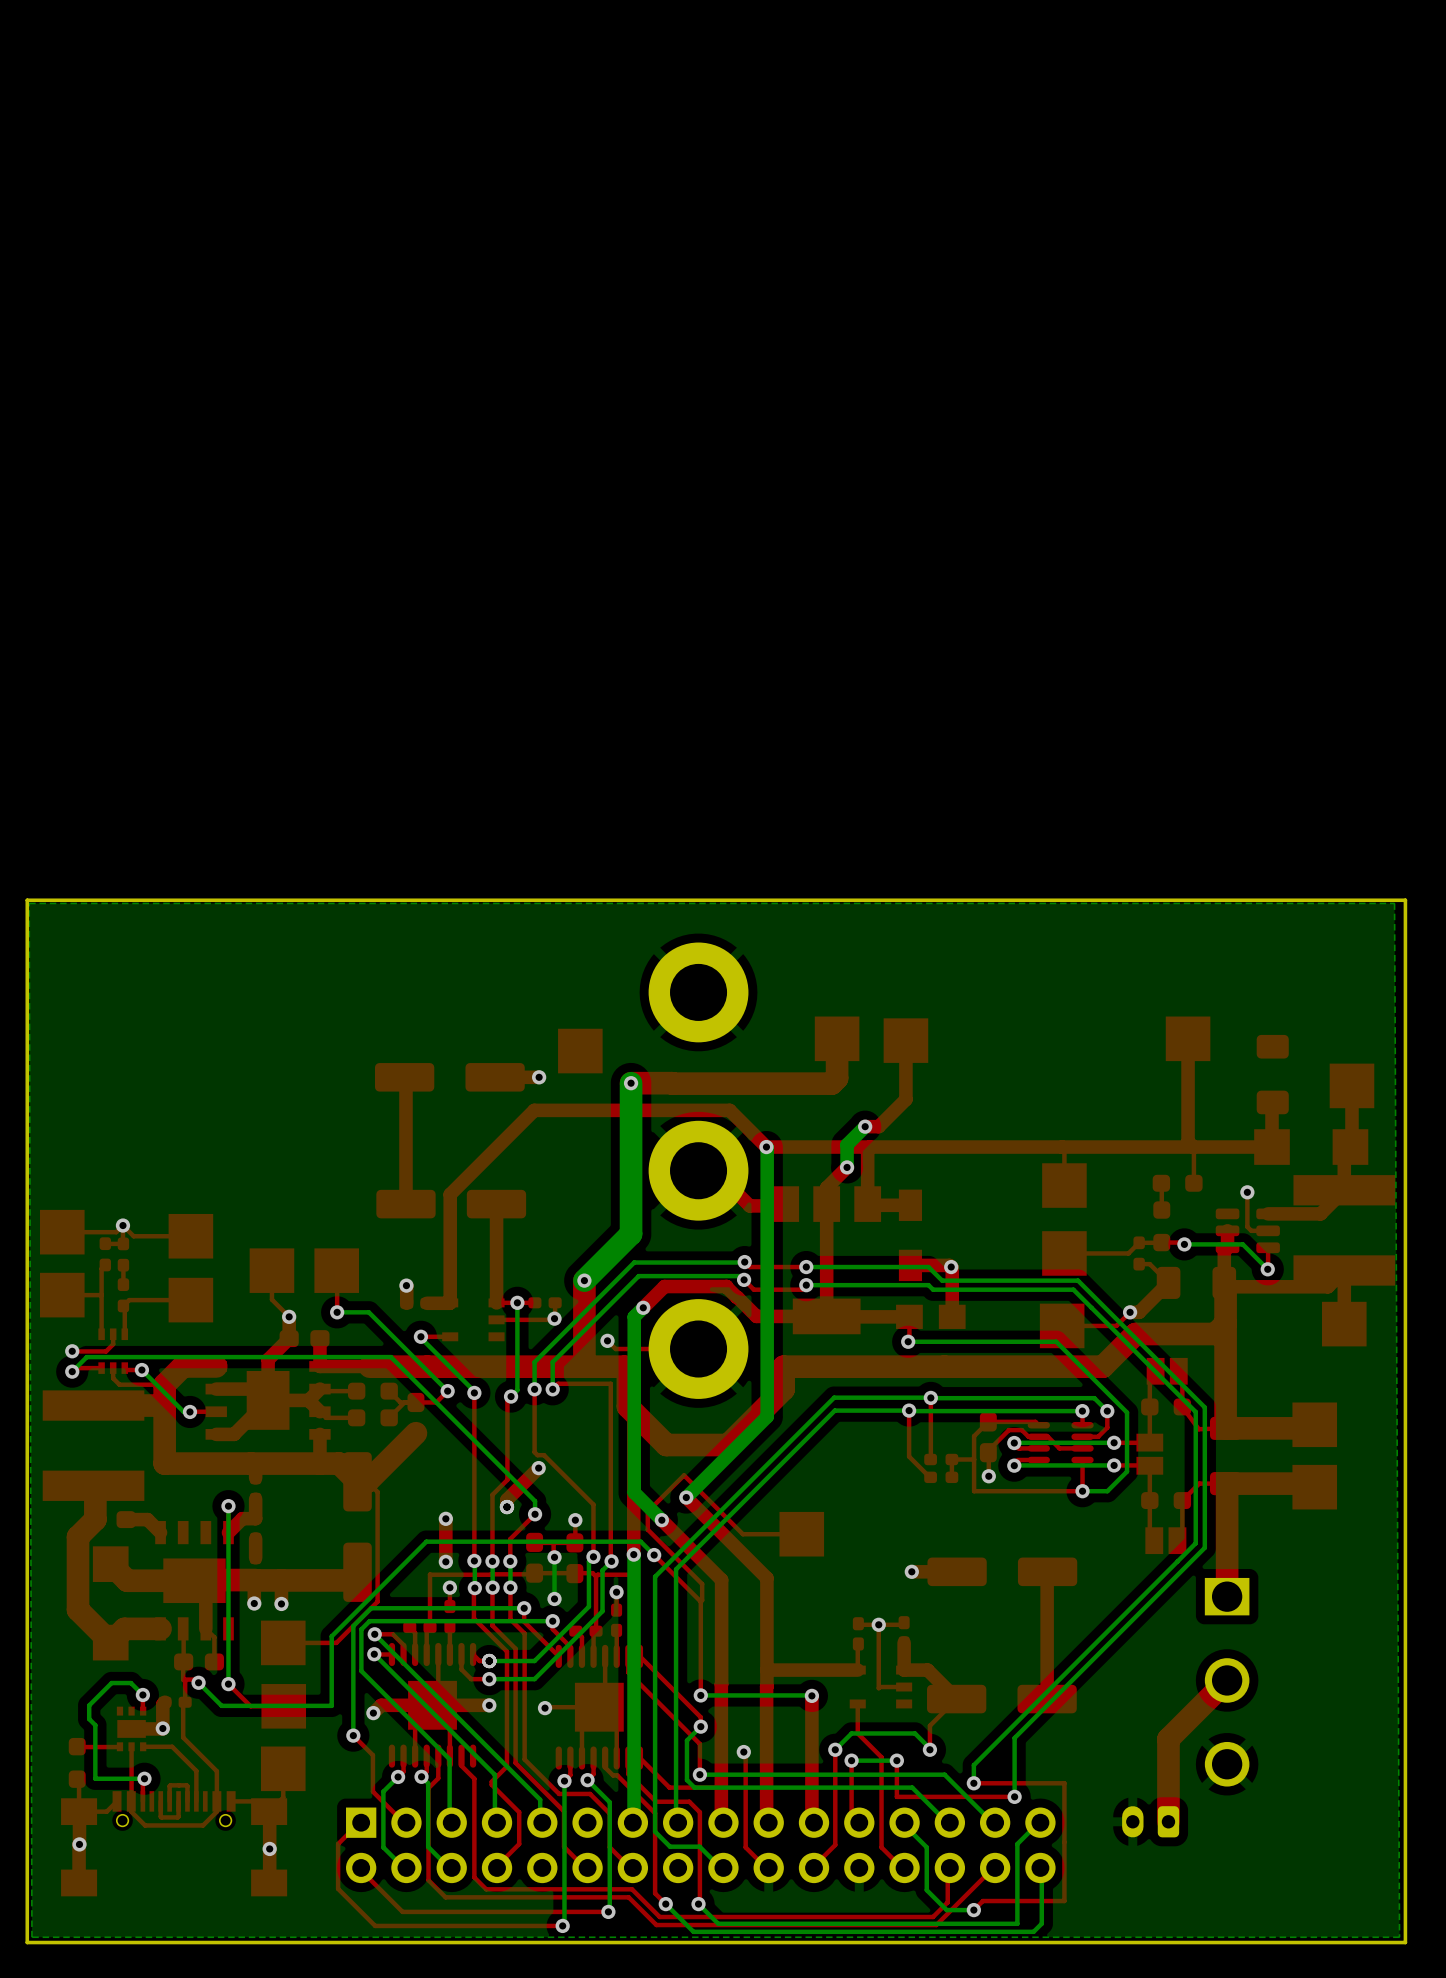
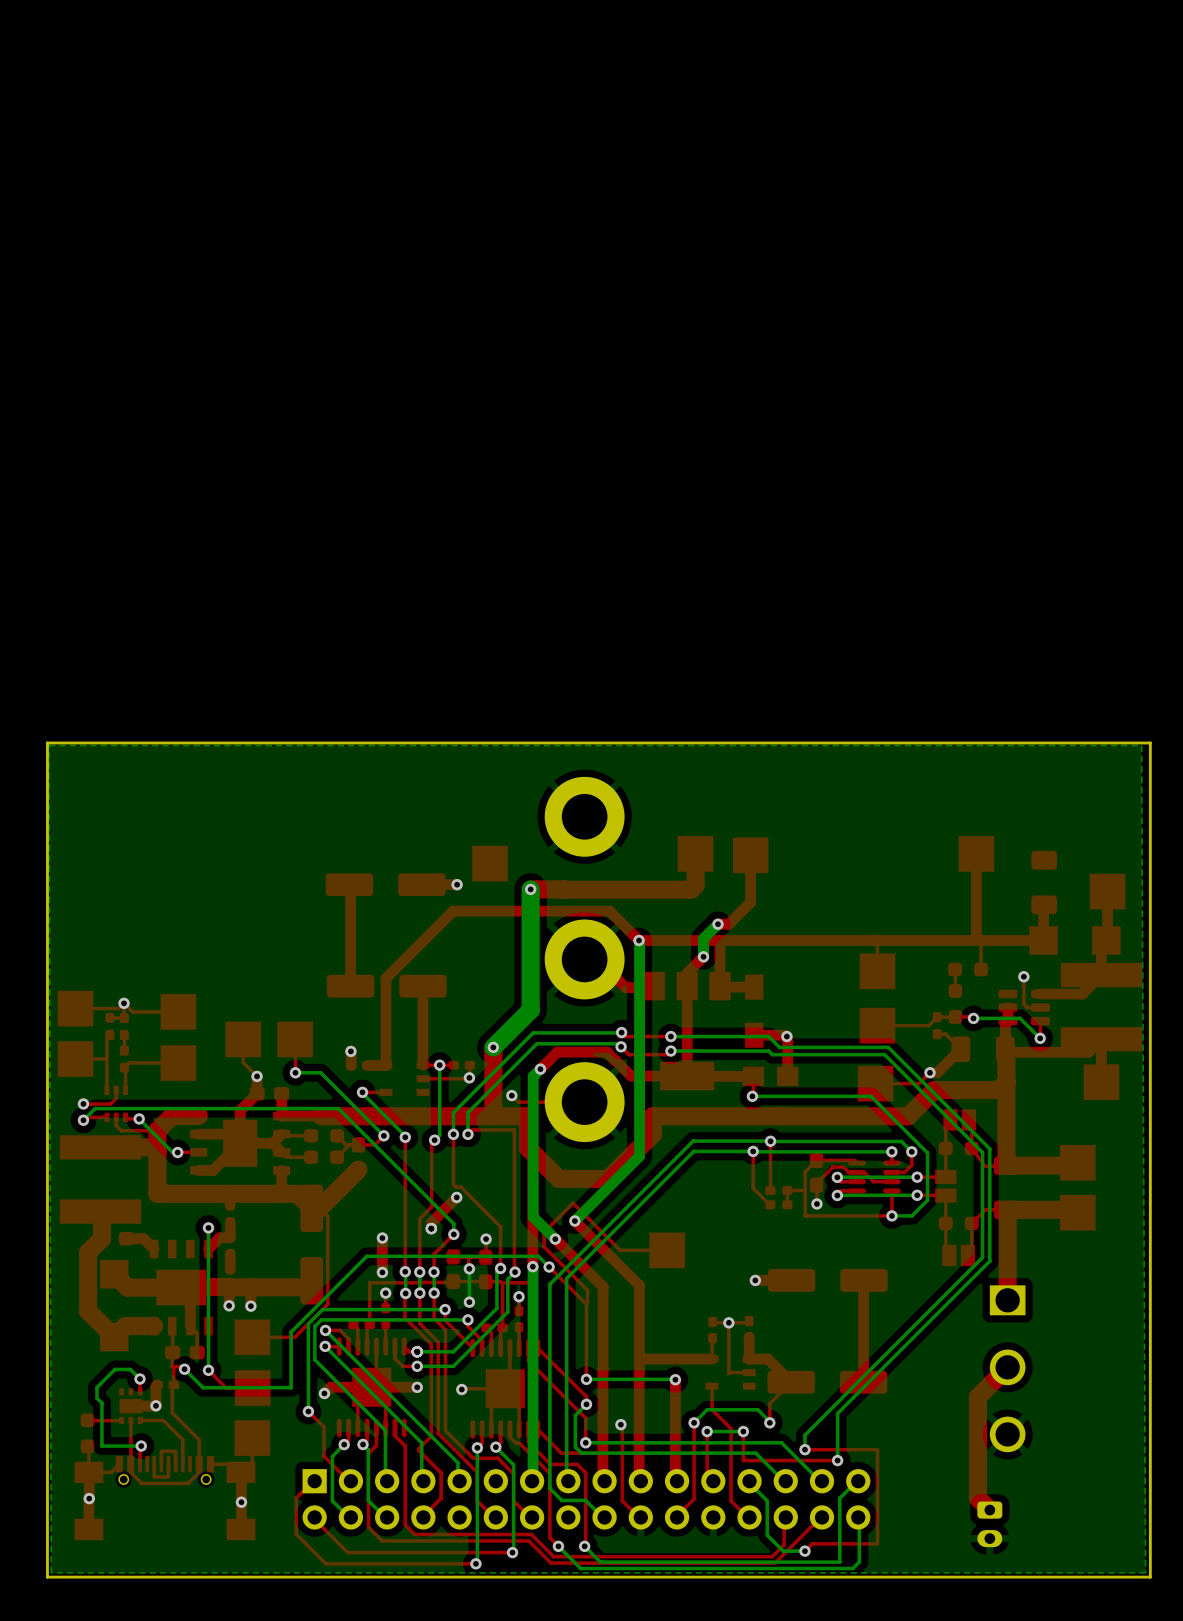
top track: (1189, 1717) (1168, 1739) (1168, 1821) -> (977, 1397) (977, 1498) (989, 1510)
part rotation: 0° (1150, 1821) -> 90° counterclockwise (989, 1524)
part position: (1150, 1821) -> (989, 1524)

